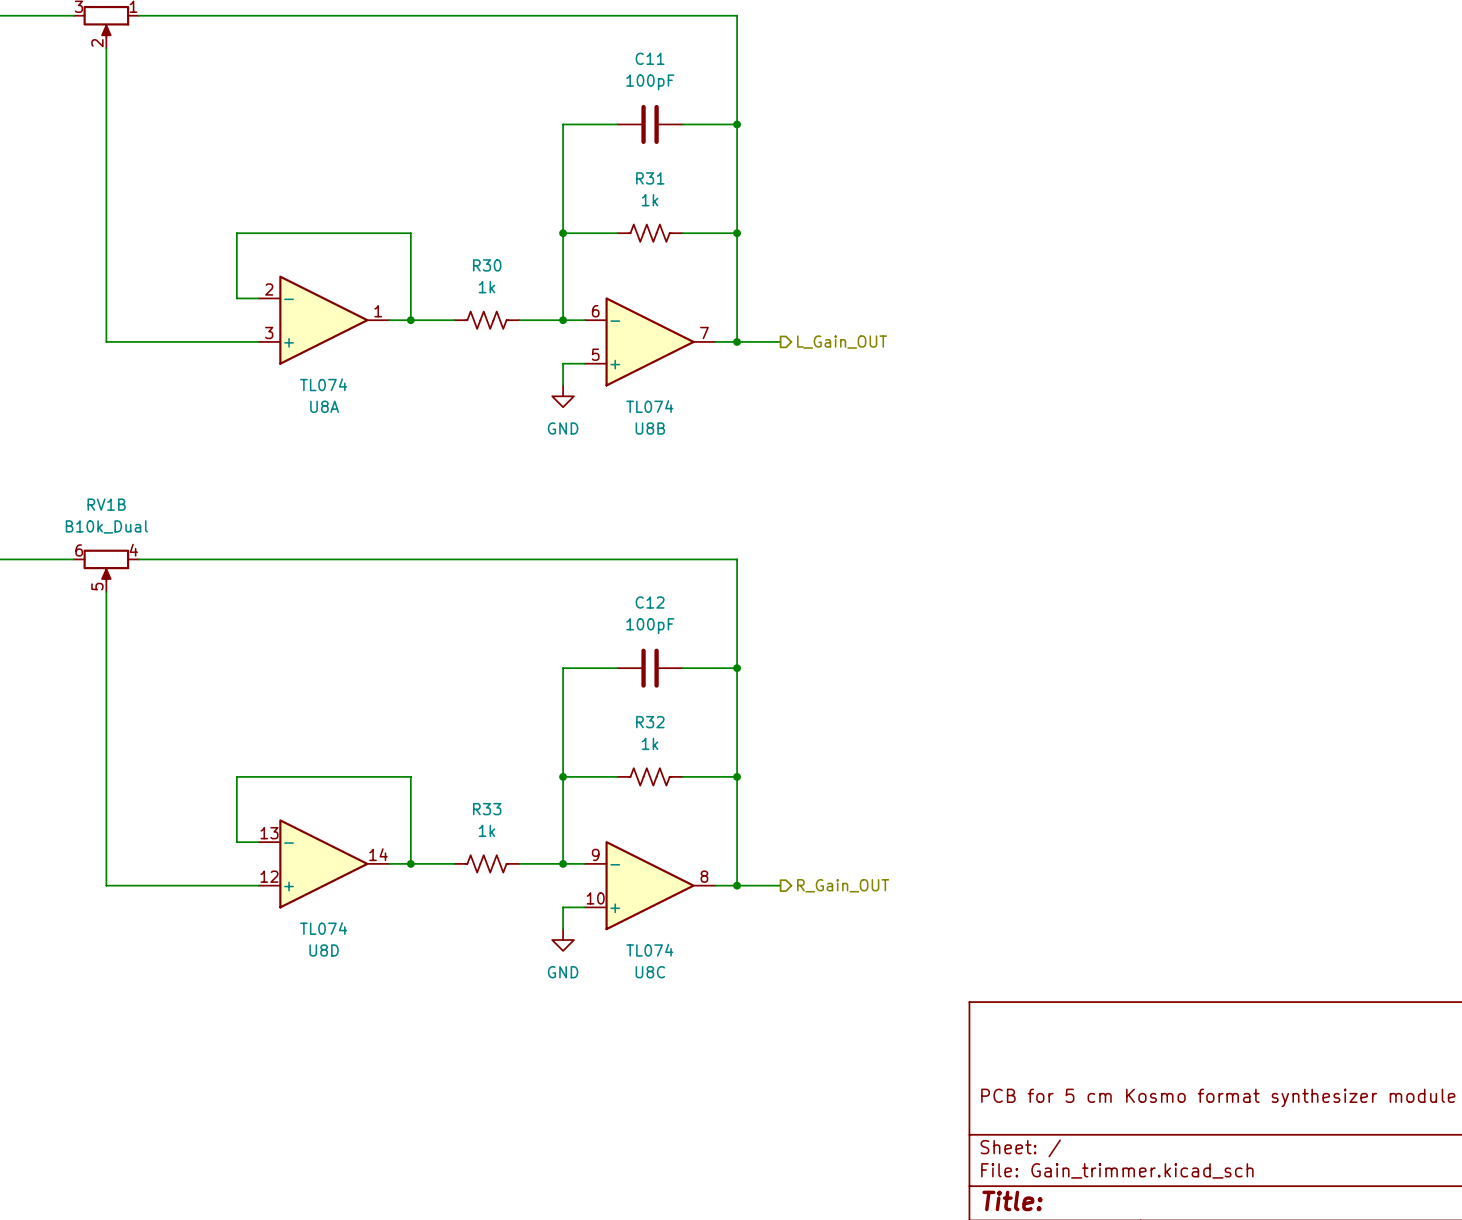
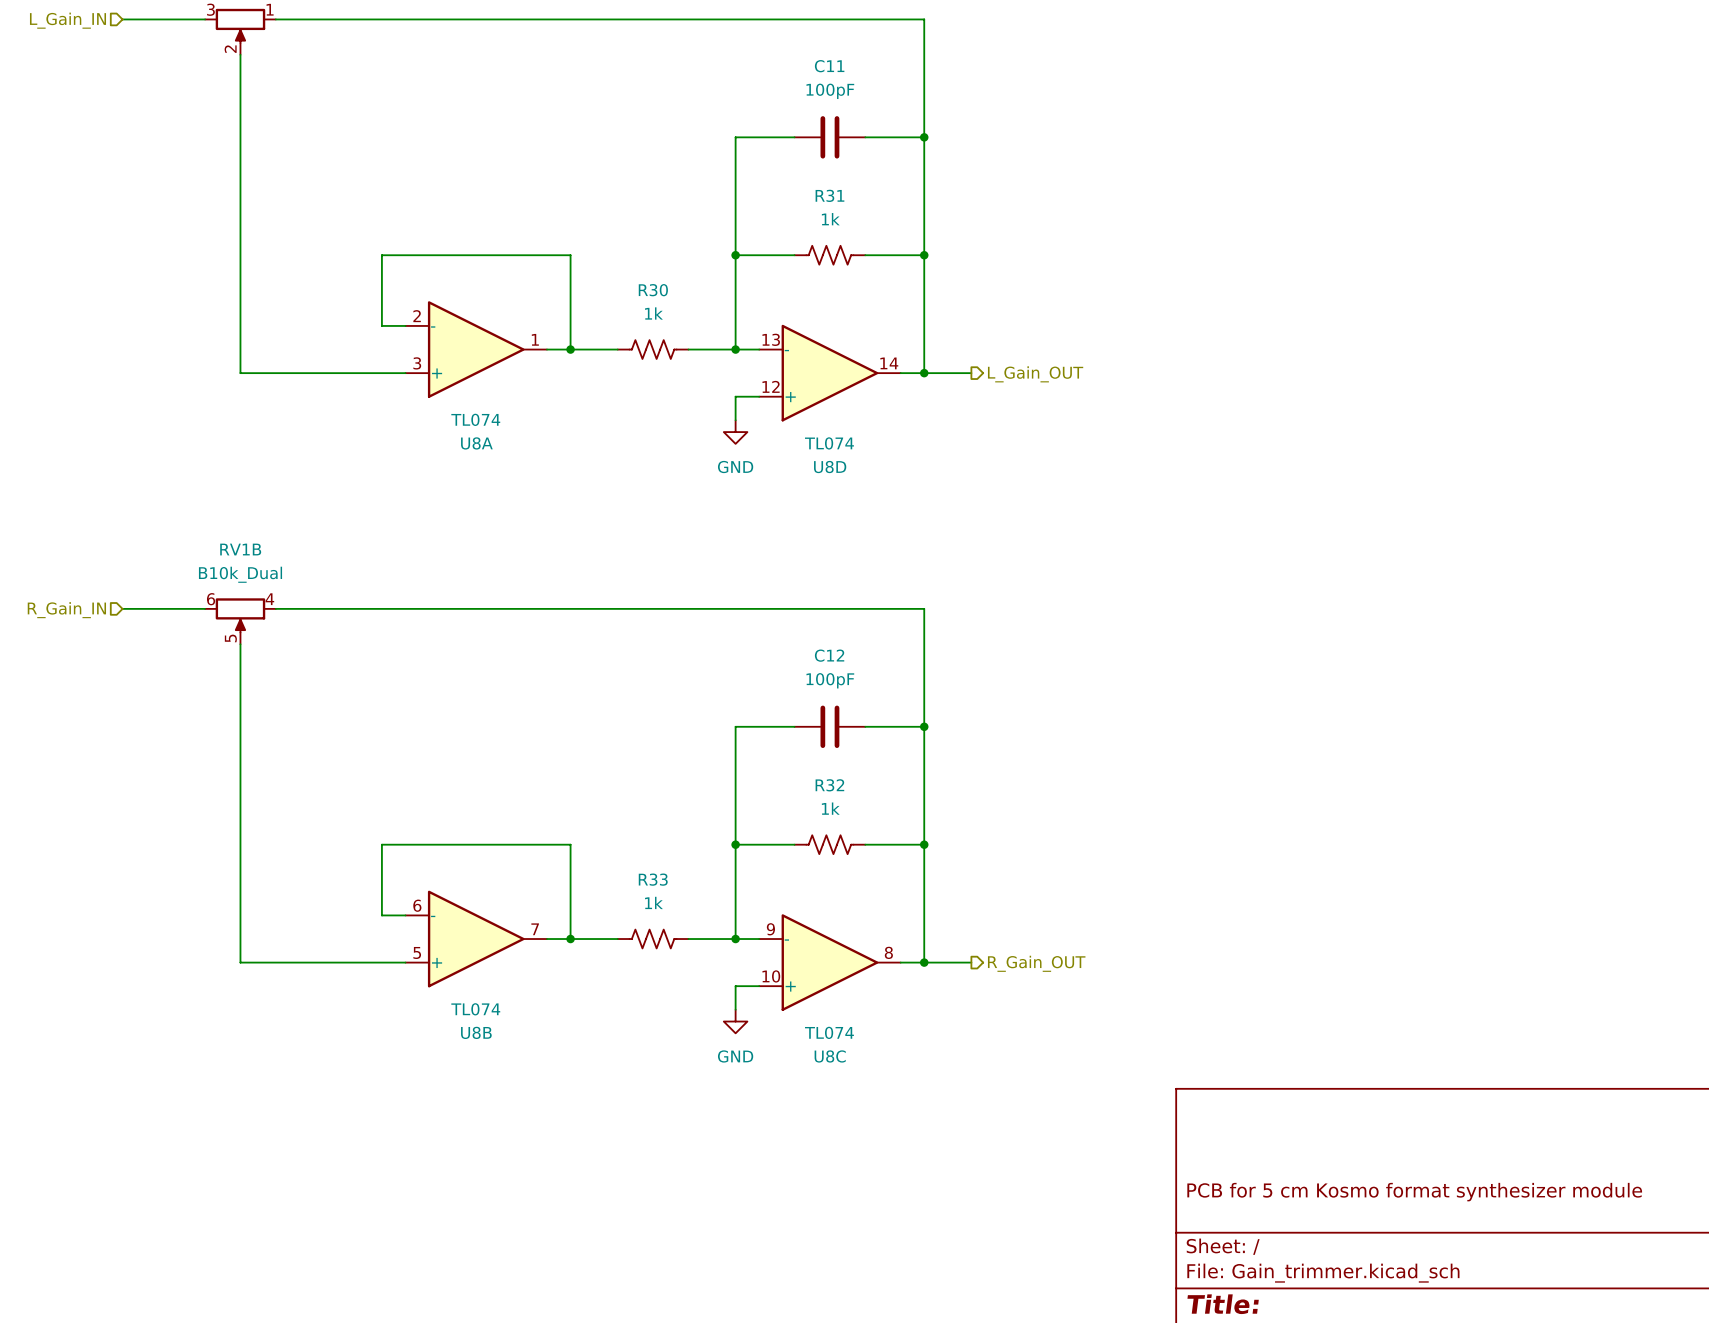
U8B position: (650, 341) -> (476, 939)
U8D position: (323, 863) -> (829, 373)

